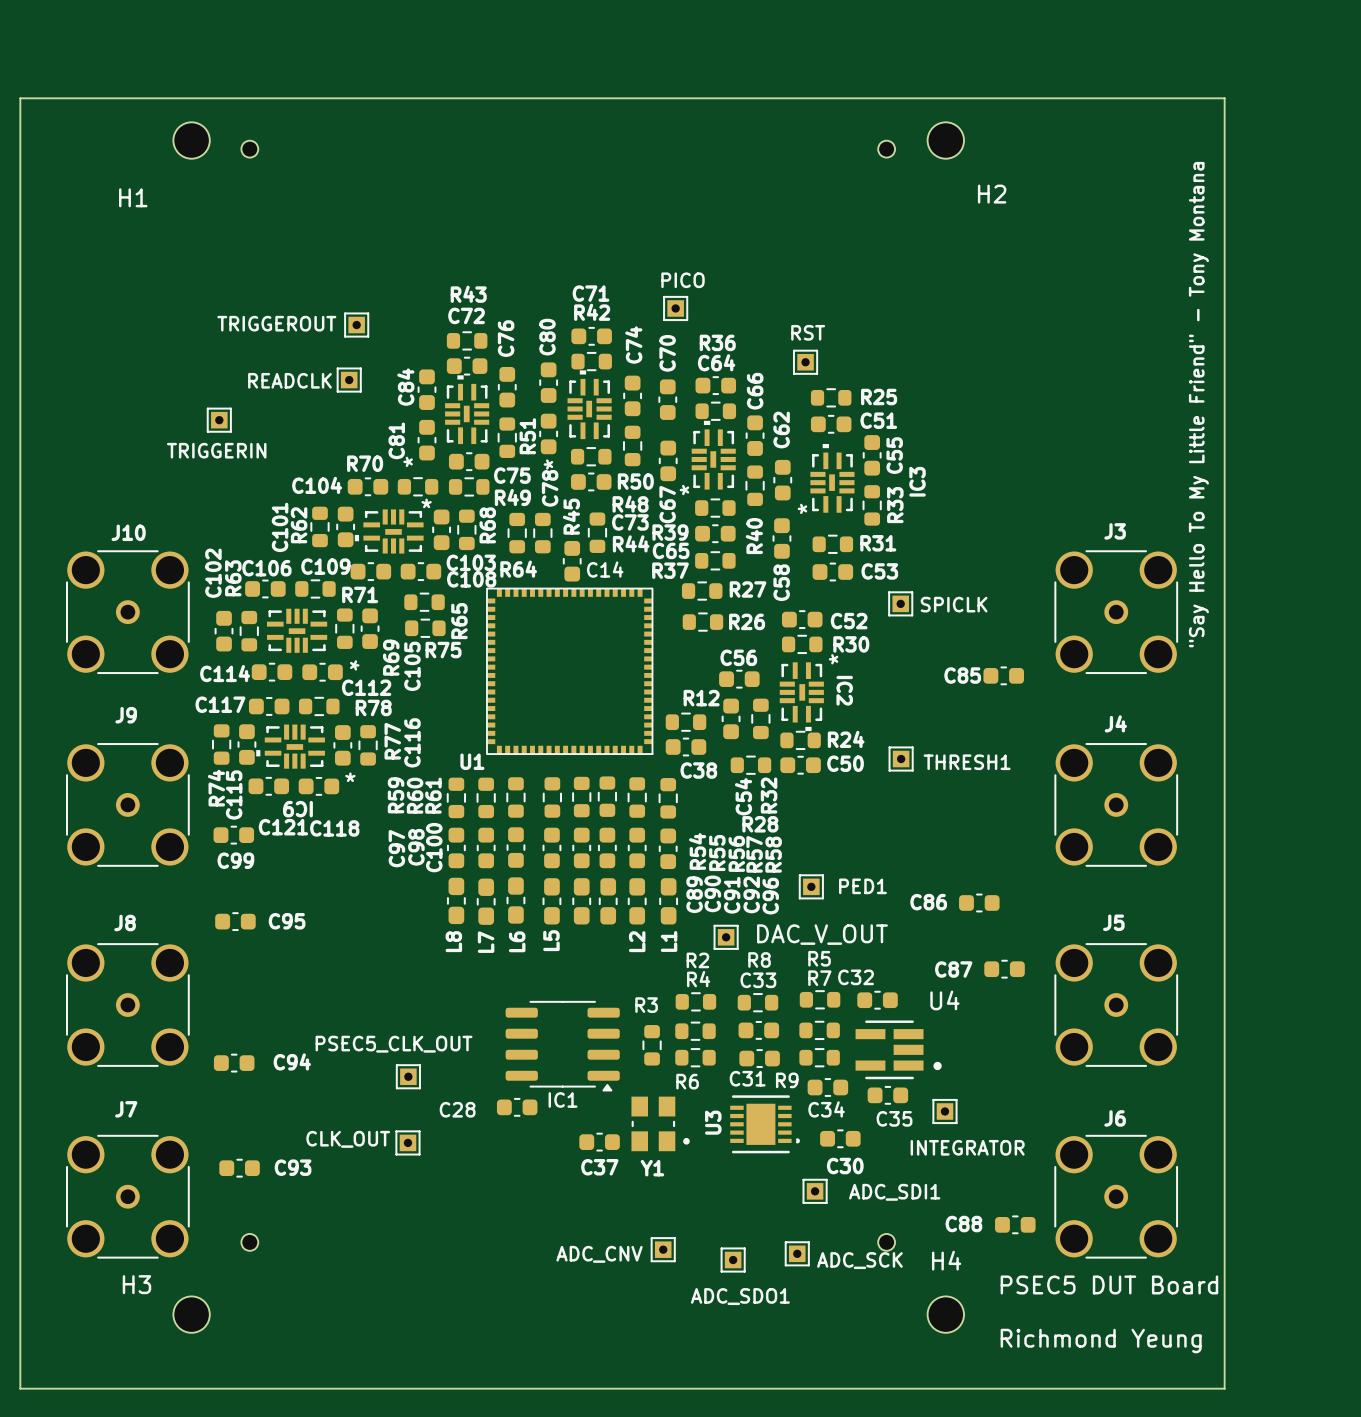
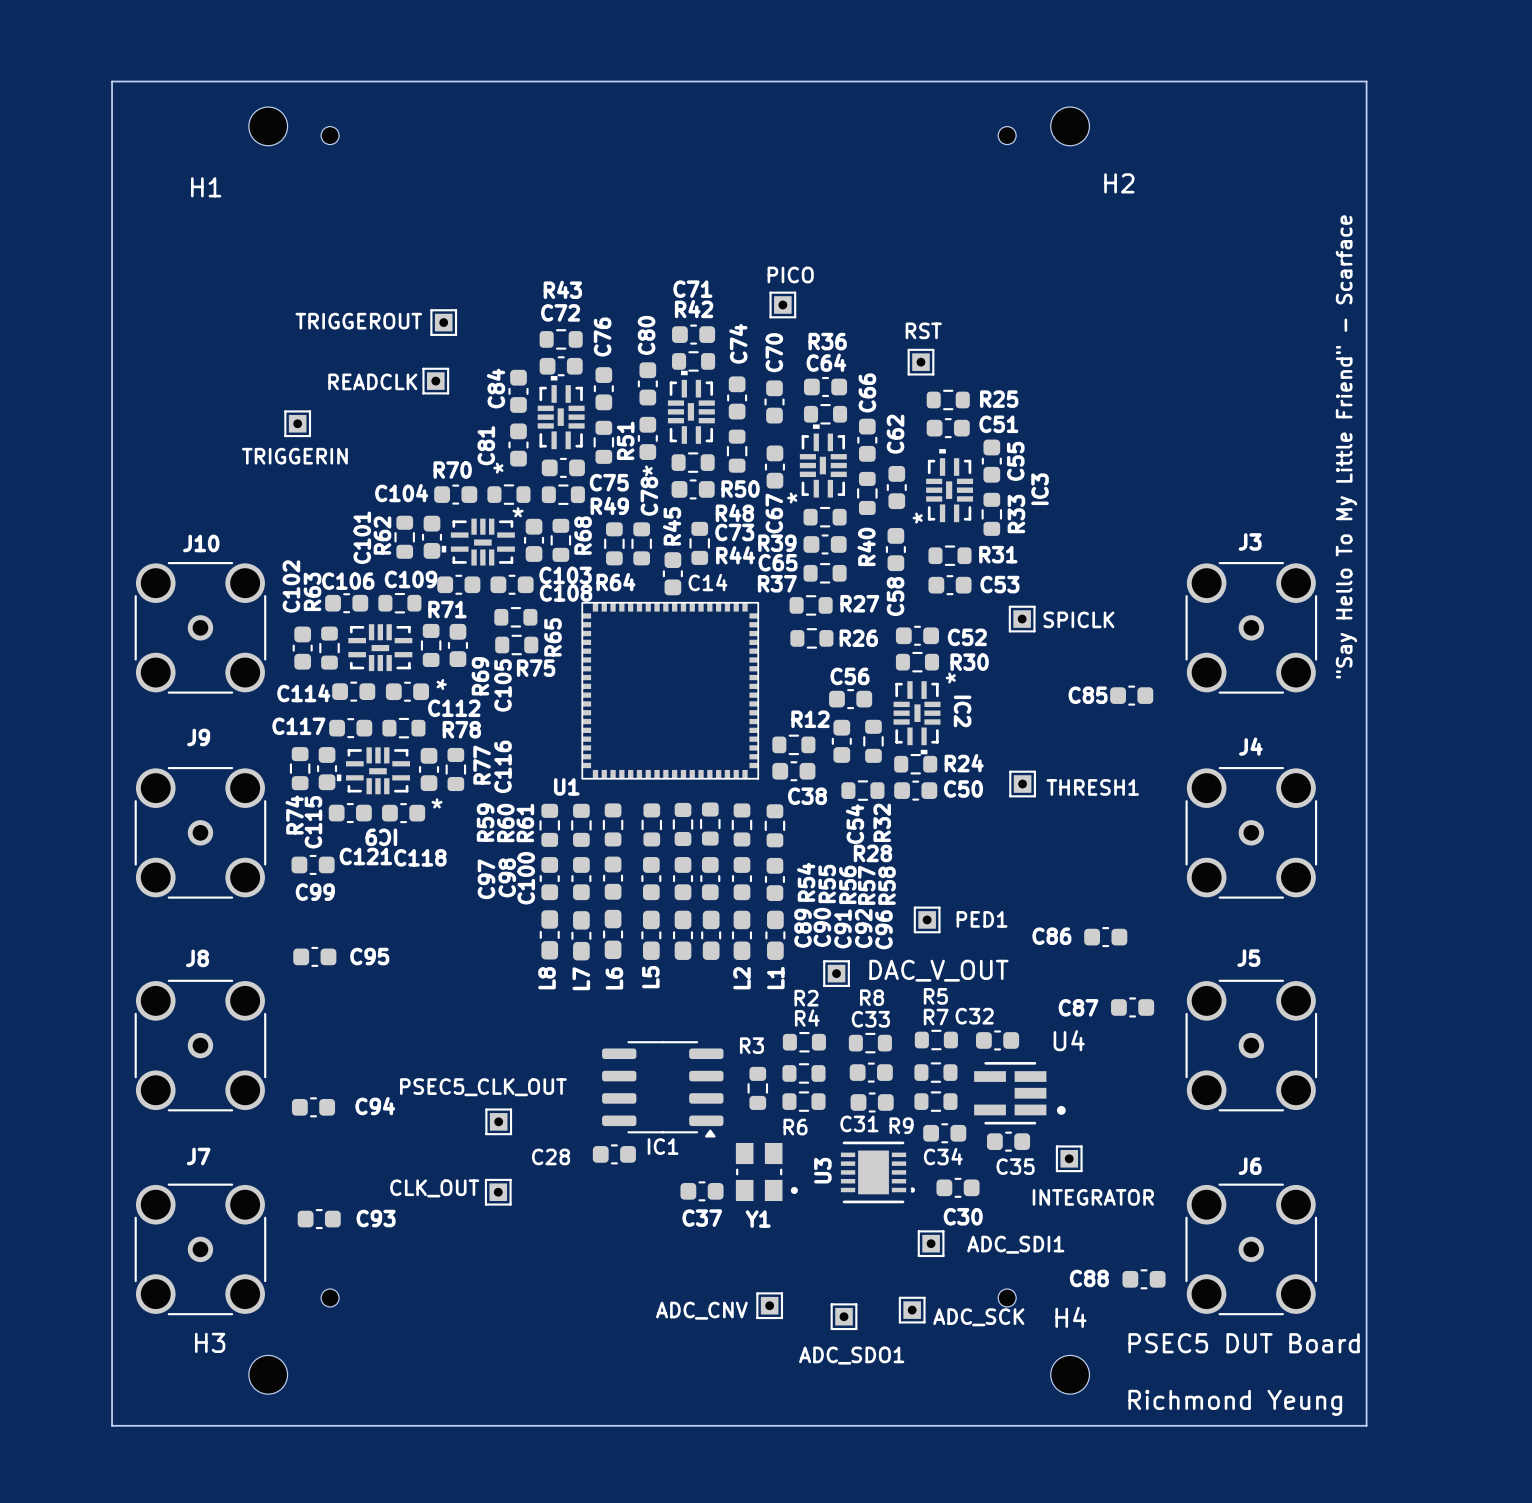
board edge: (44, 98) (20, 98) (20, 1388) (1224, 1388) (1224, 1362) -> (112, 81) (112, 1425) (1366, 1425)
text: "Say Hello To My Little Friend" - Tony Montana (1198, 404) -> "Say Hello To My Little Friend" - Scarface (1346, 446)

